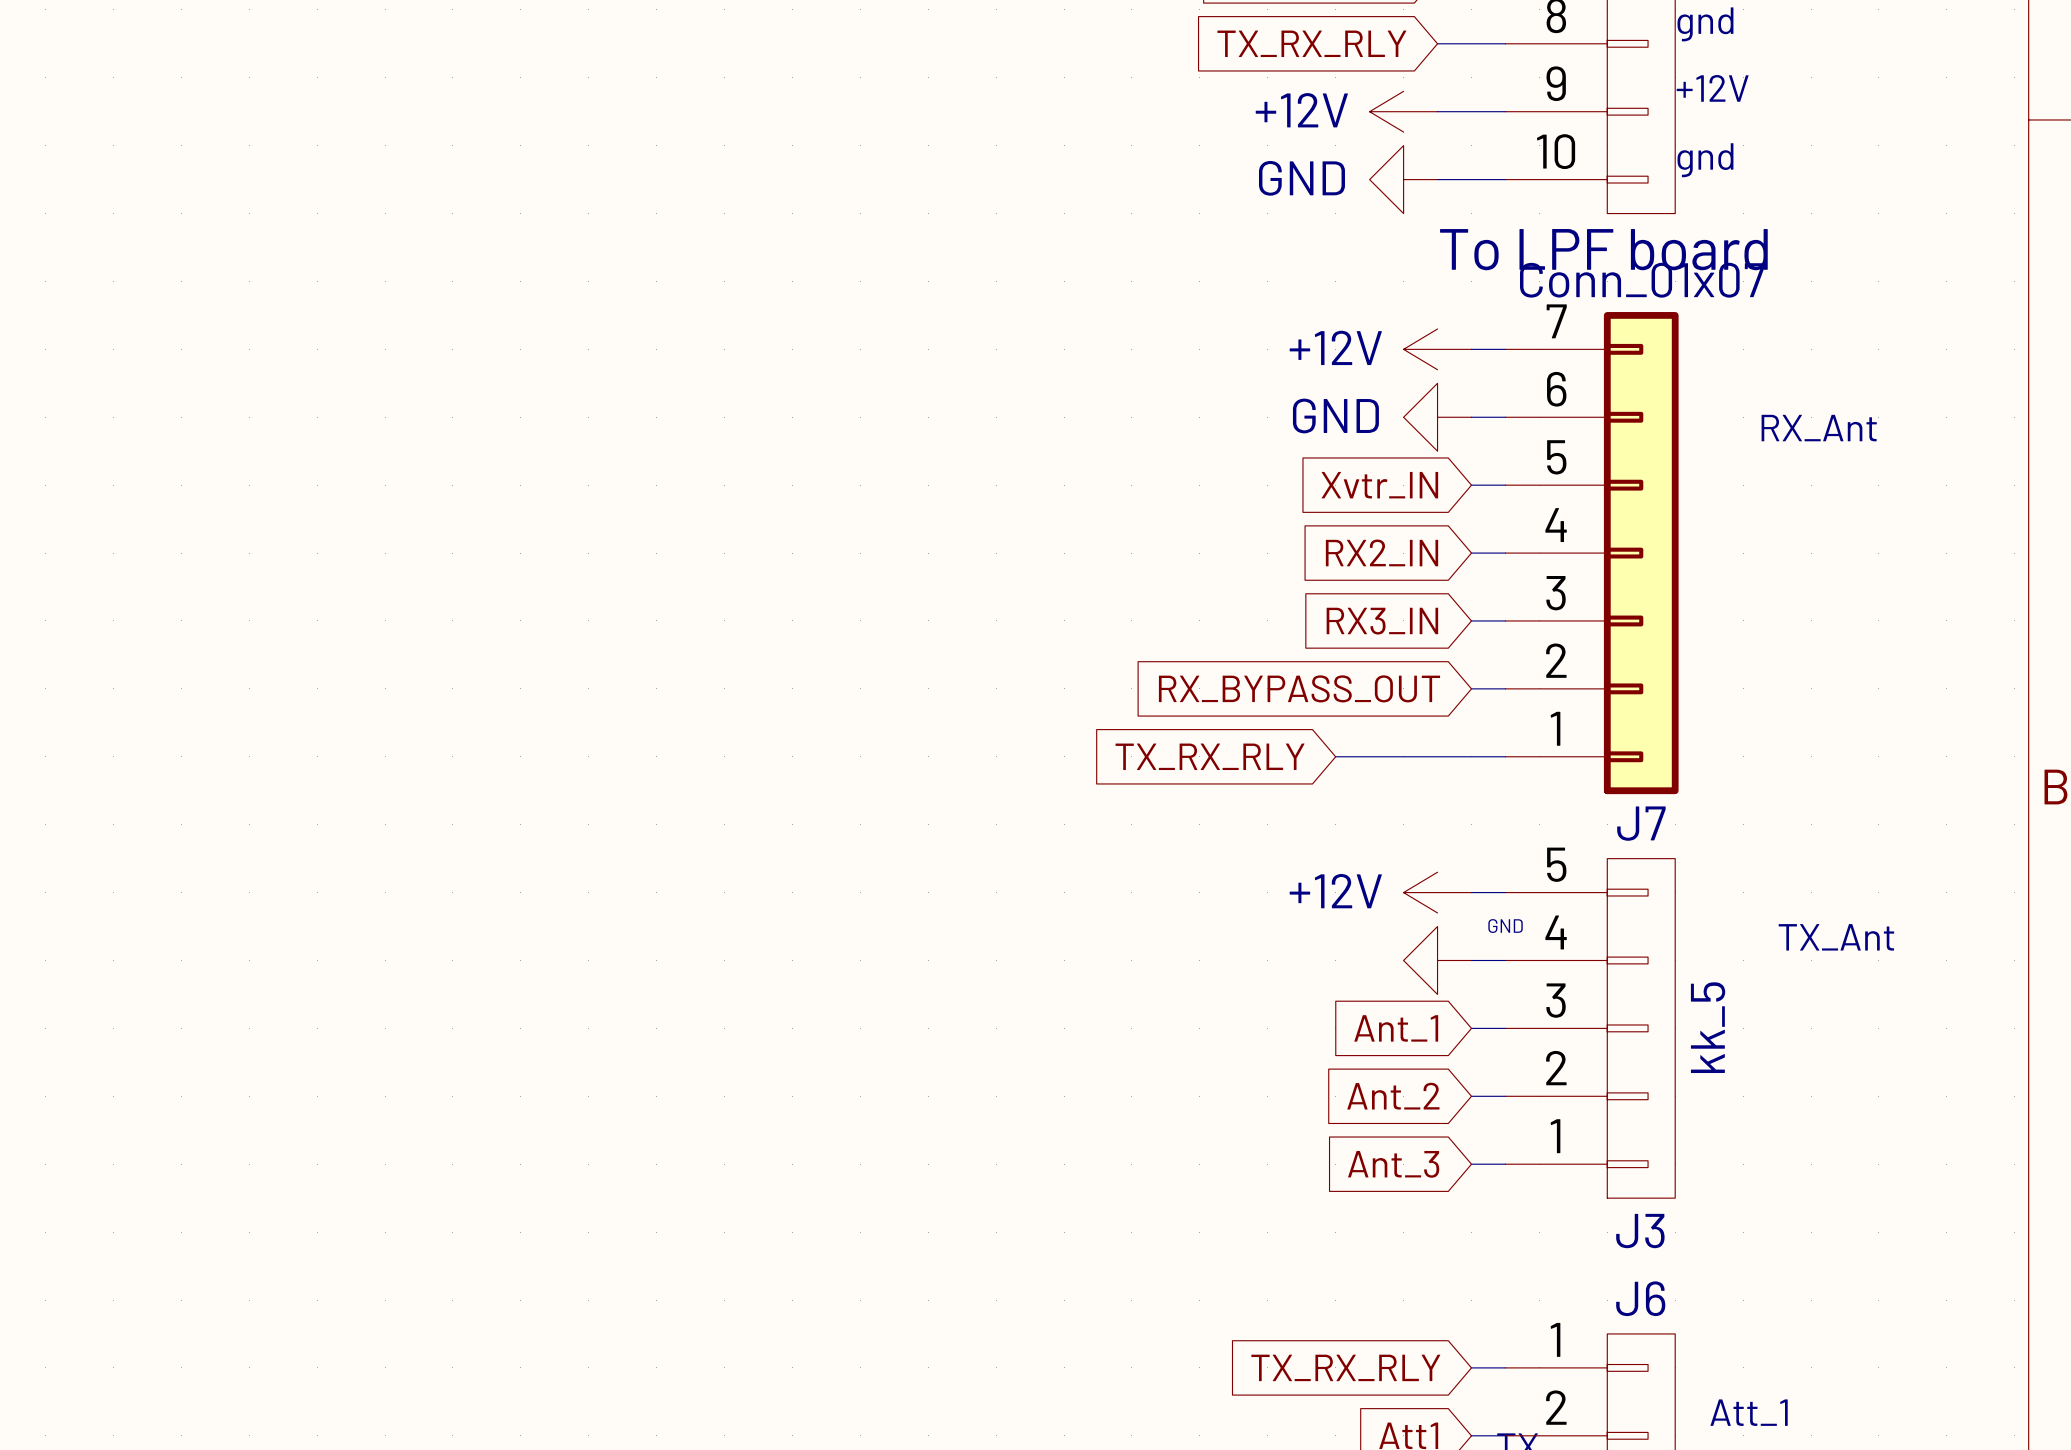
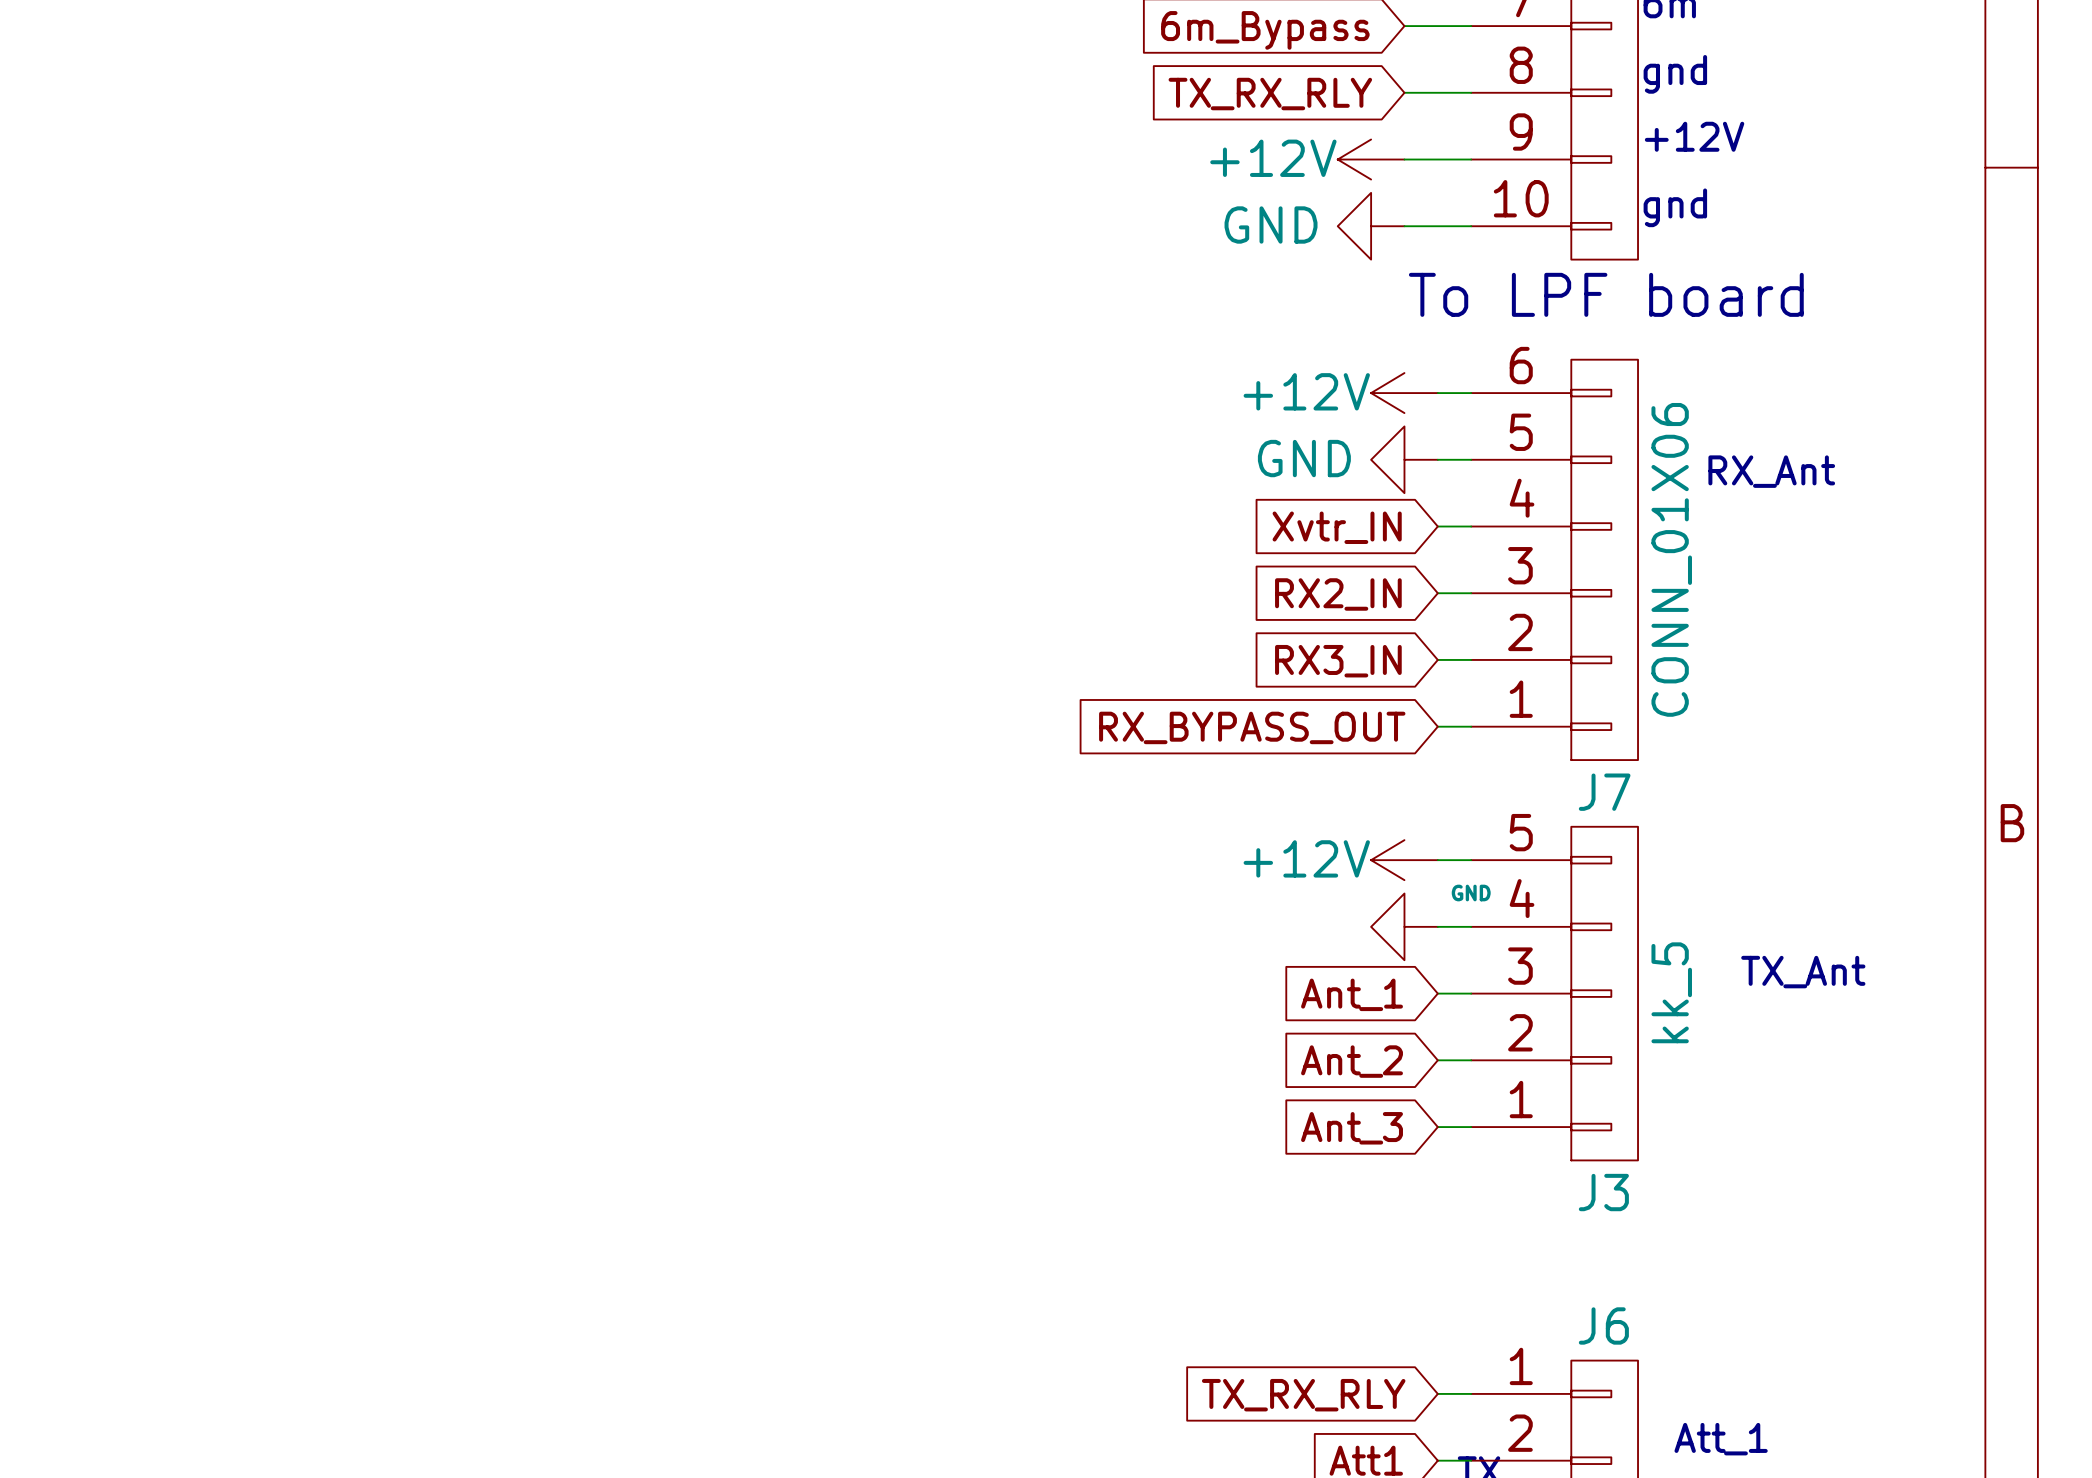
J7 value: Conn_01x07 (1642, 280) -> CONN_01X06 (1671, 559)
J7 symbol: [1505, 312, 1679, 795] -> [1471, 359, 1639, 761]
global label: TX_RX_RLY (1210, 756) -> none
wire: (1335, 756) (1505, 756) -> none
power symbol: none -> +12V (1404, 860)
power symbol: +12V (1437, 892) -> GND (1404, 926)
global label: none -> Ant_1 (1352, 994)
power symbol: GND (1437, 960) -> none
global label: Ant_1 (1396, 1028) -> Ant_2 (1352, 1061)
J3 position: (1590, 1028) -> (1554, 993)
global label: Ant_2 (1393, 1096) -> Ant_3 (1352, 1128)
global label: Ant_3 (1393, 1164) -> none
wire: (1471, 1164) (1505, 1164) -> (1437, 860) (1471, 860)

